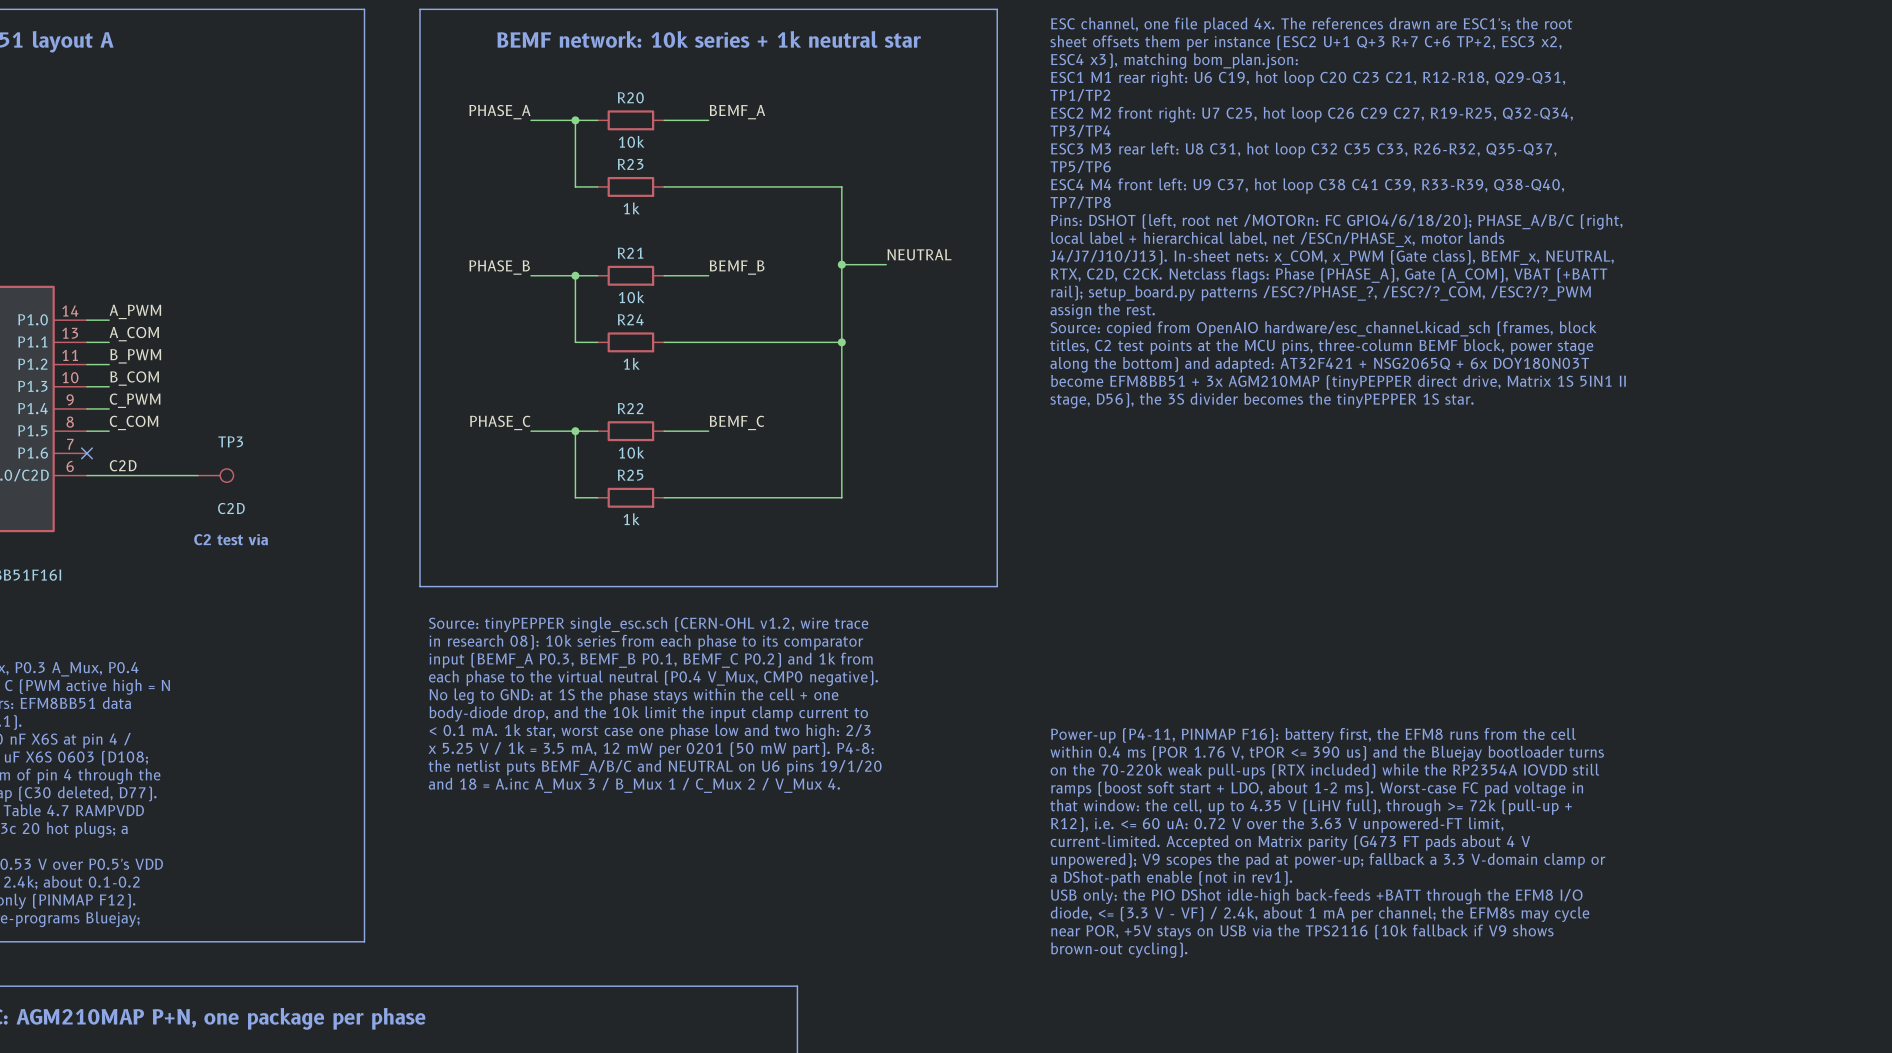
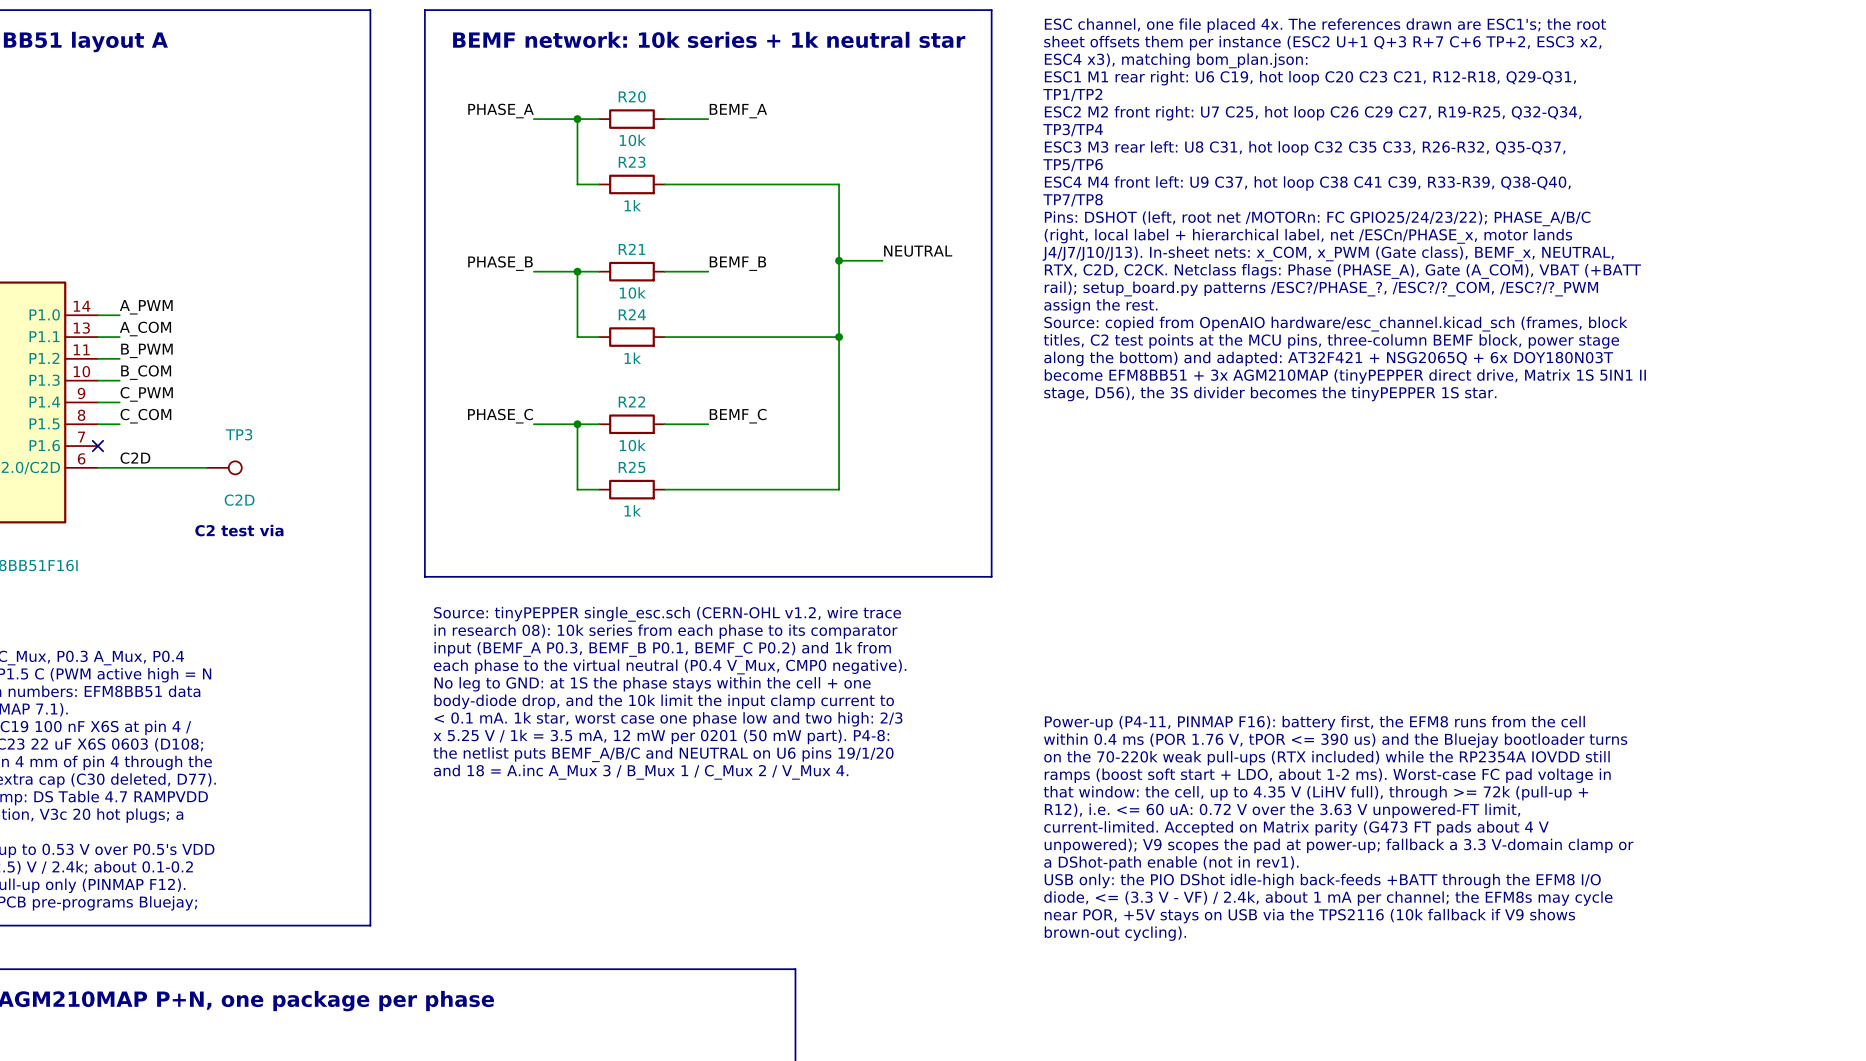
text: Pins: DSHOT (left, root net /MOTORn: FC GPIO4/6/18/20); PHASE_A/B/C (right, (1336, 221) -> Pins: DSHOT (left, root net /MOTORn: FC GPIO25/24/23/22); PHASE_A/B/C (1317, 218)
text: local label + hierarchical label, net /ESCn/PHASE_x, motor lands (1277, 239) -> (right, local label + hierarchical label, net /ESCn/PHASE_x, motor lands (1308, 236)

